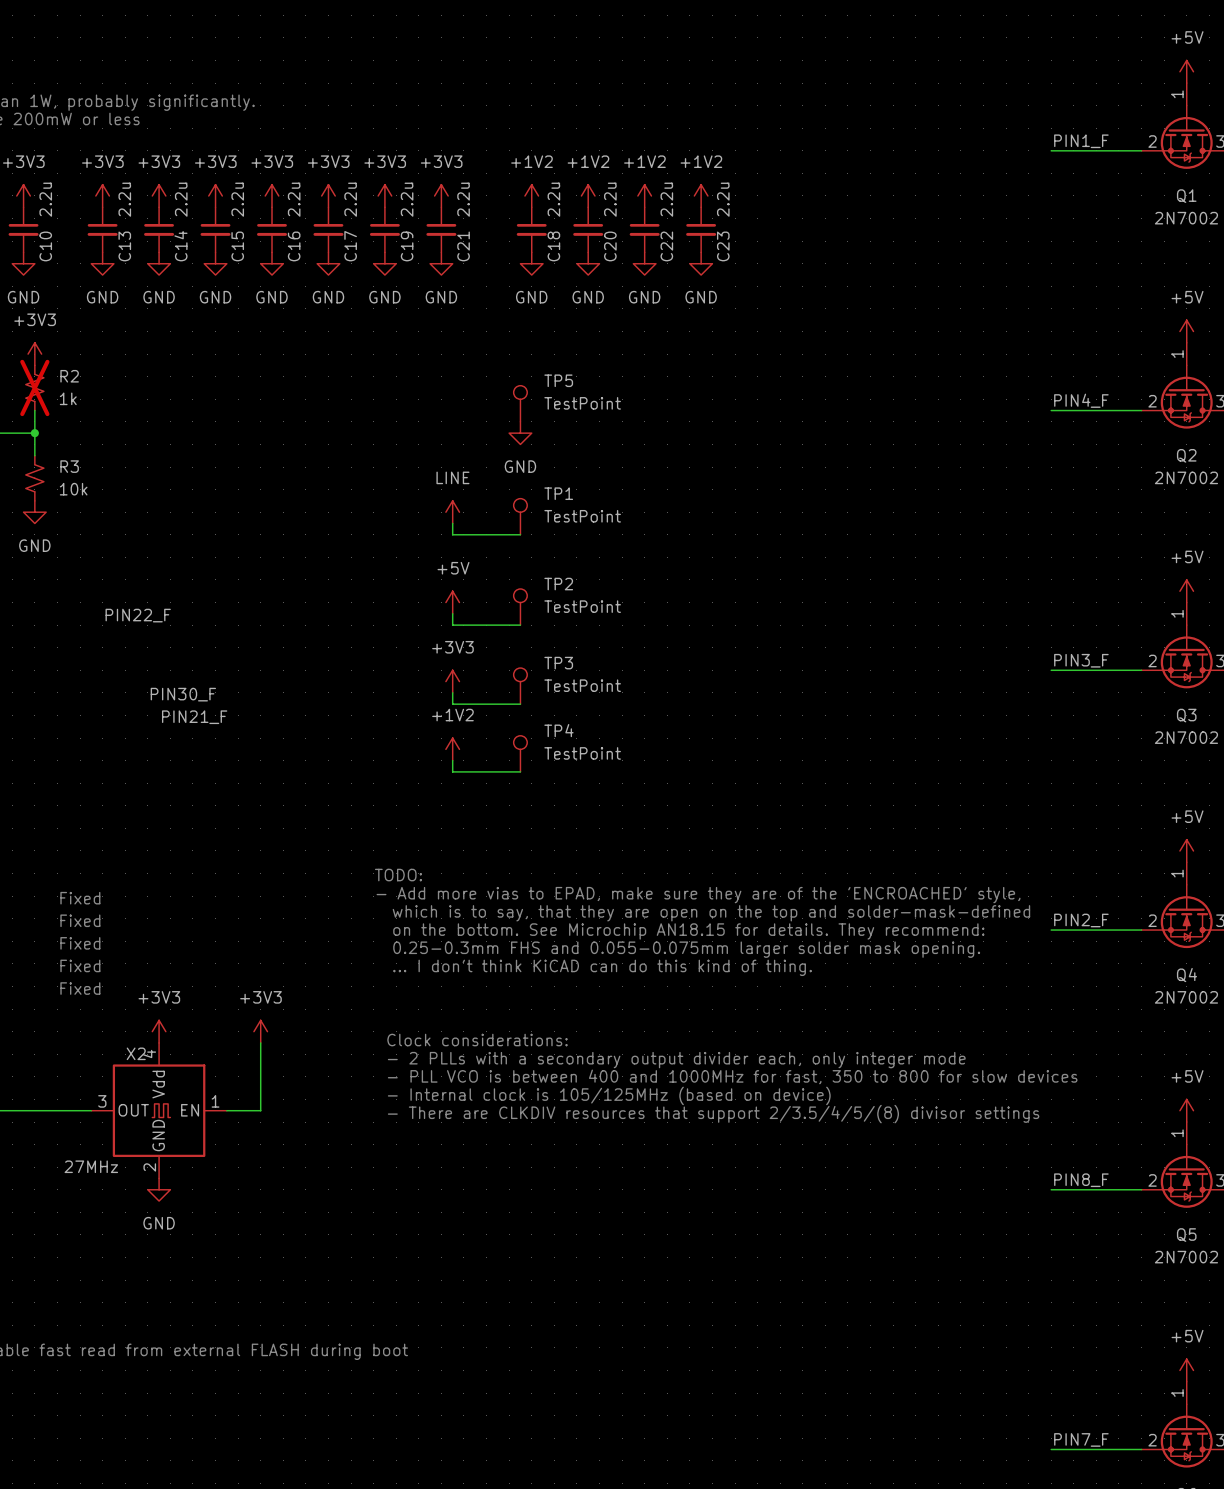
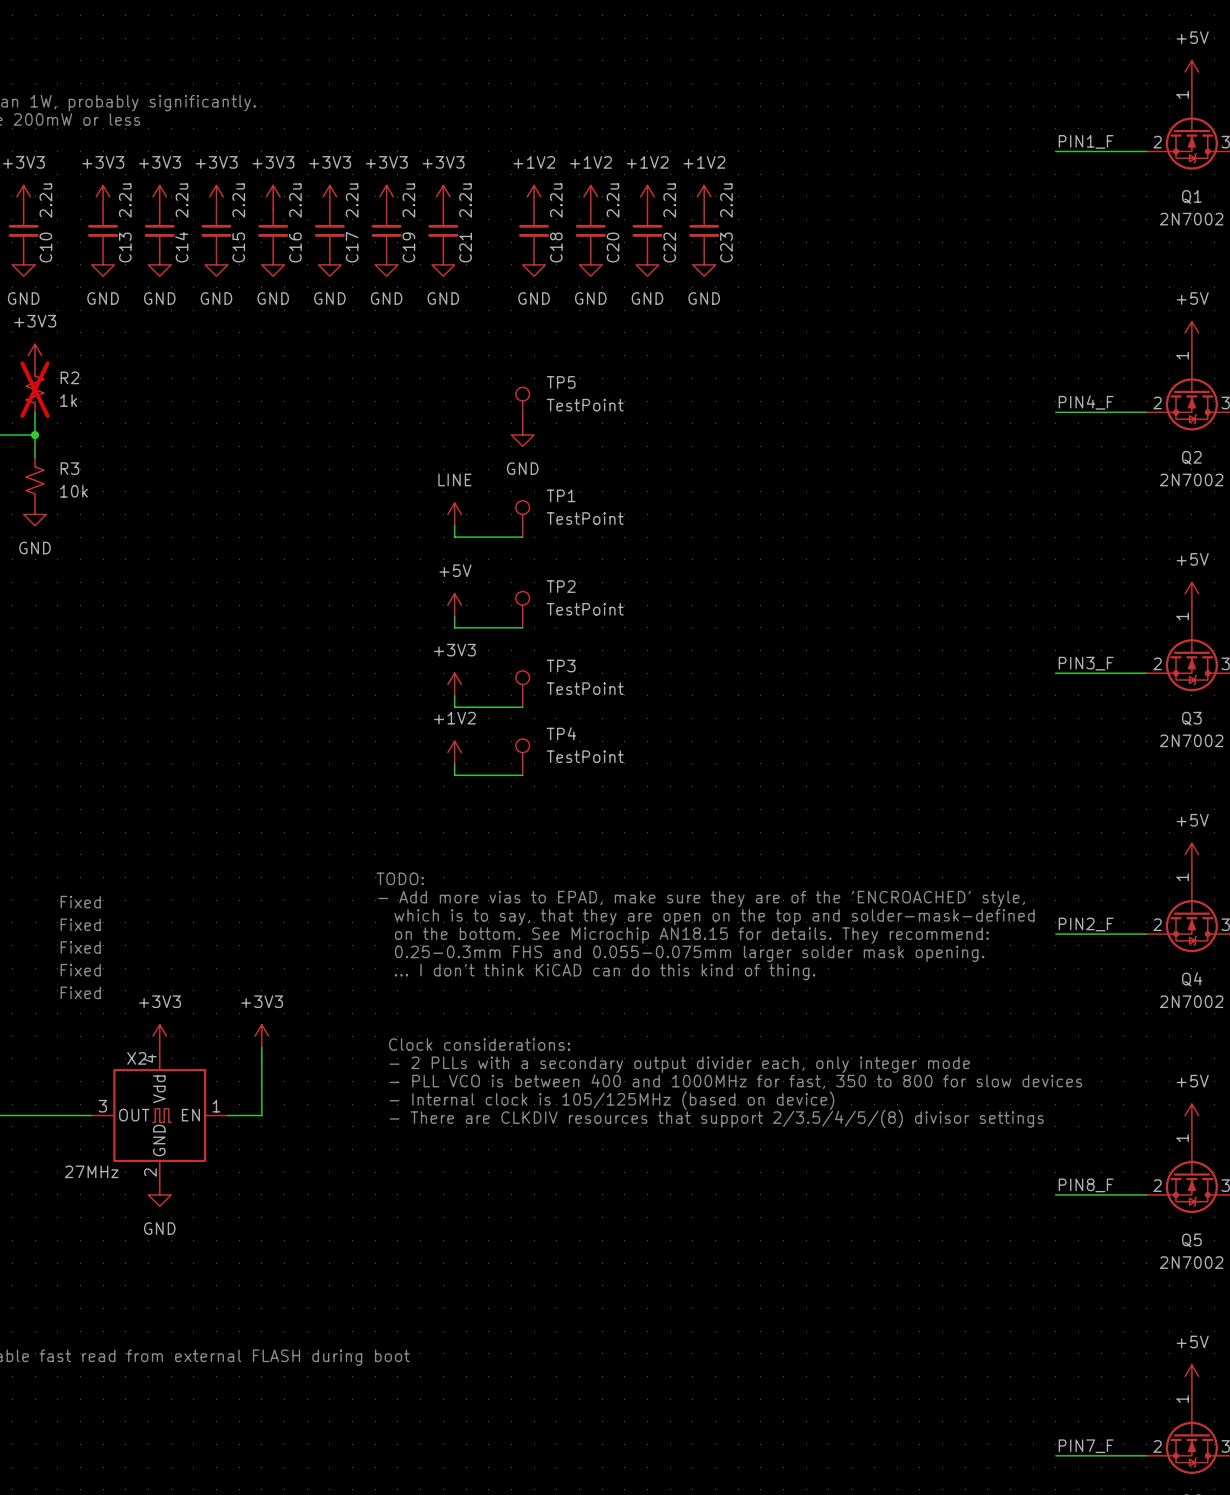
label: PIN22_F (138, 615) -> none
label: PIN30_F (183, 694) -> none
label: PIN21_F (194, 717) -> none

